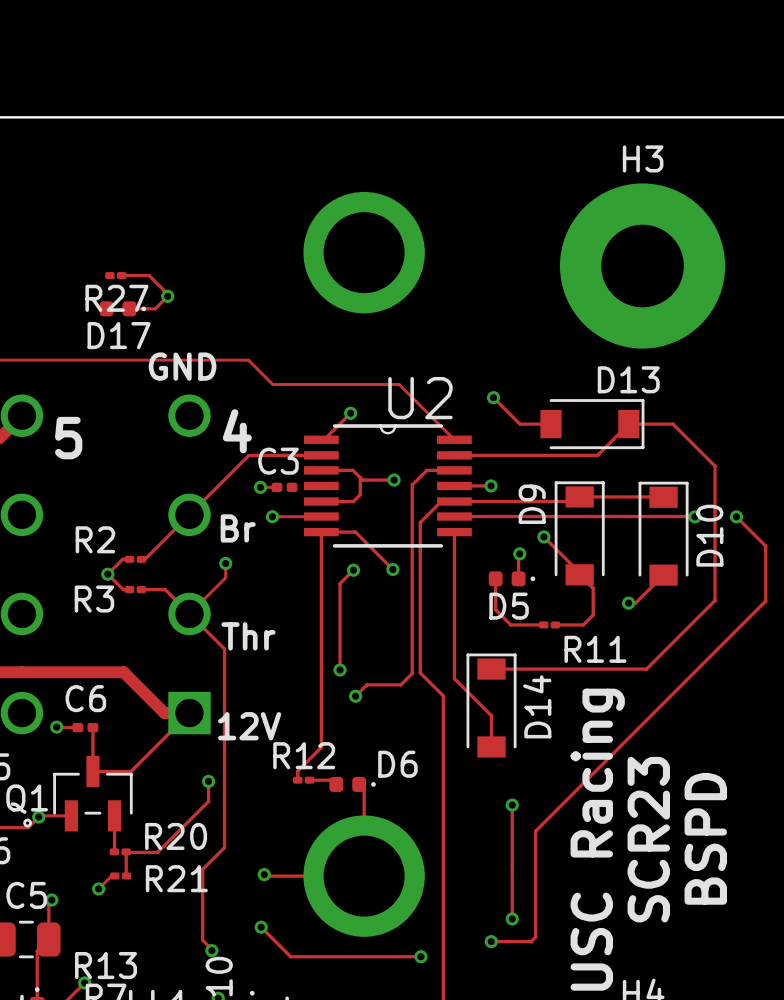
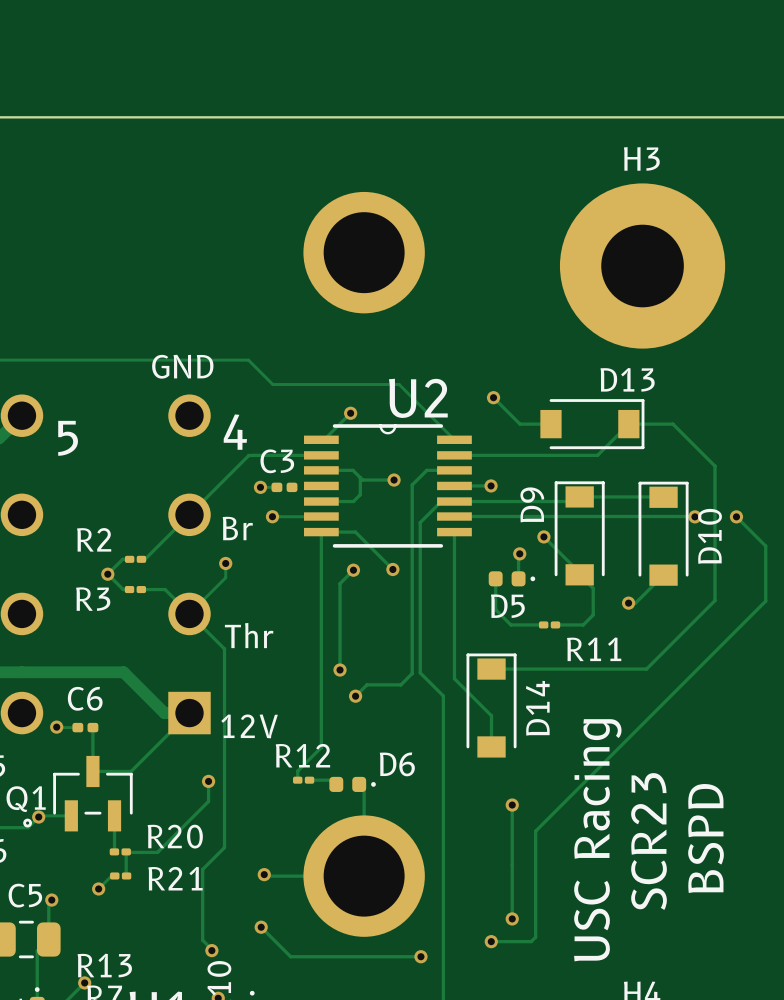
R27: (115, 275) -> none
track: (121, 275) (149, 275) (167, 294) (155, 308) (129, 308) -> none
via: (167, 296) -> none
D17: (122, 308) -> none

